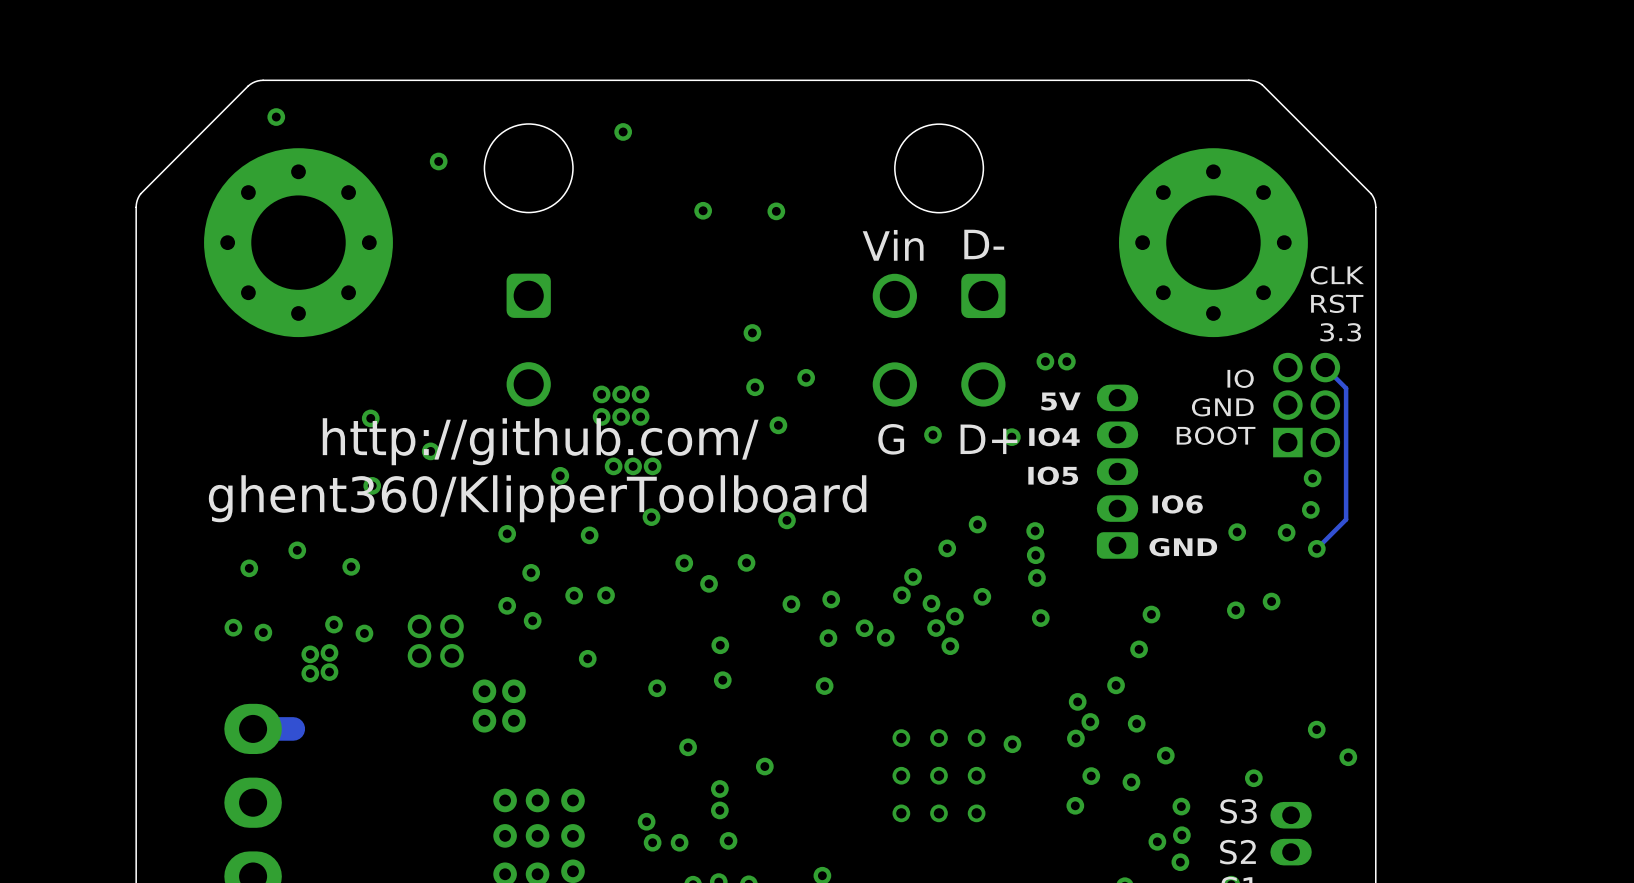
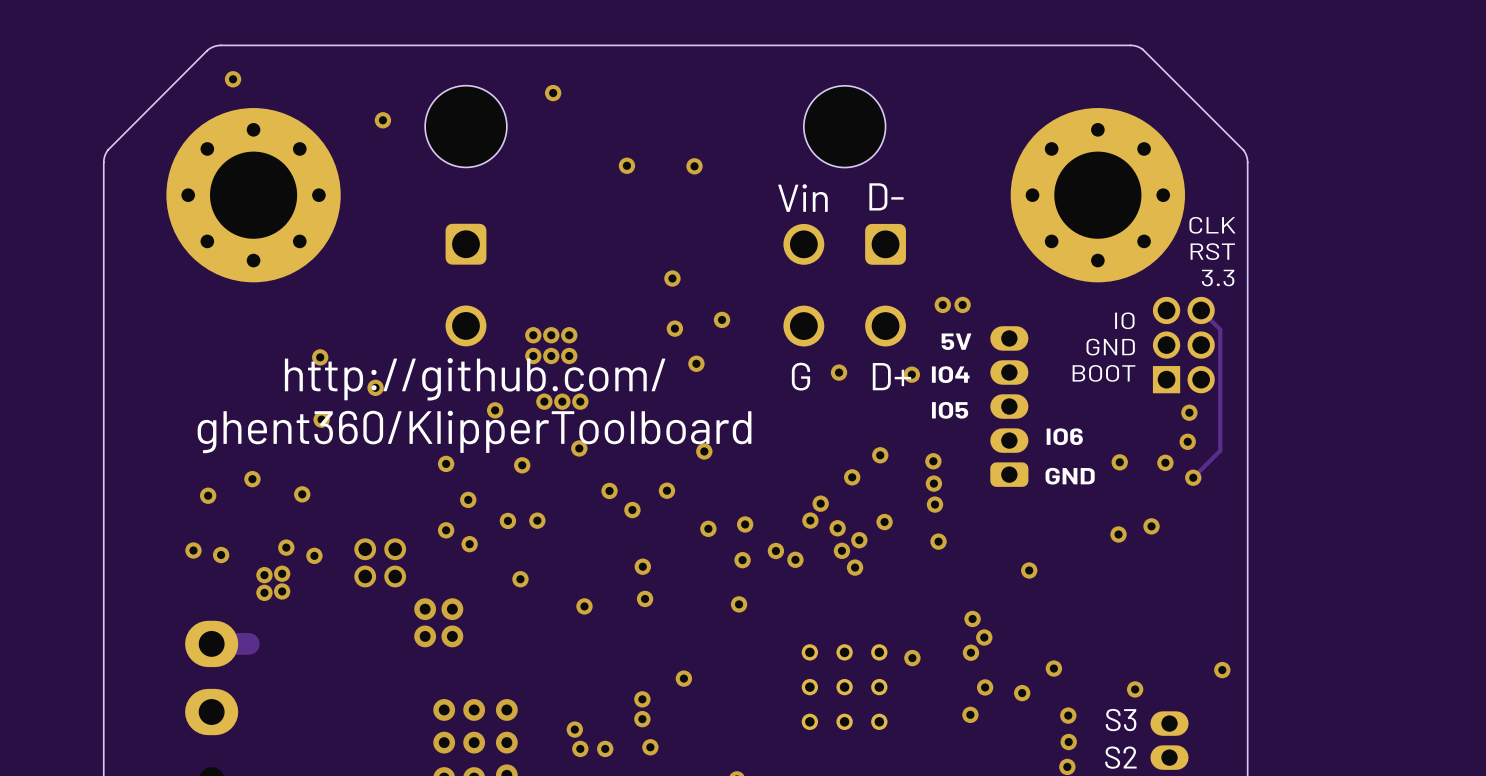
via: (1151, 614) -> none
via: (1116, 685) -> none
via: (1136, 723) -> none
via: (1316, 729) -> none
via: (688, 747) -> none
via: (1157, 841) -> none

